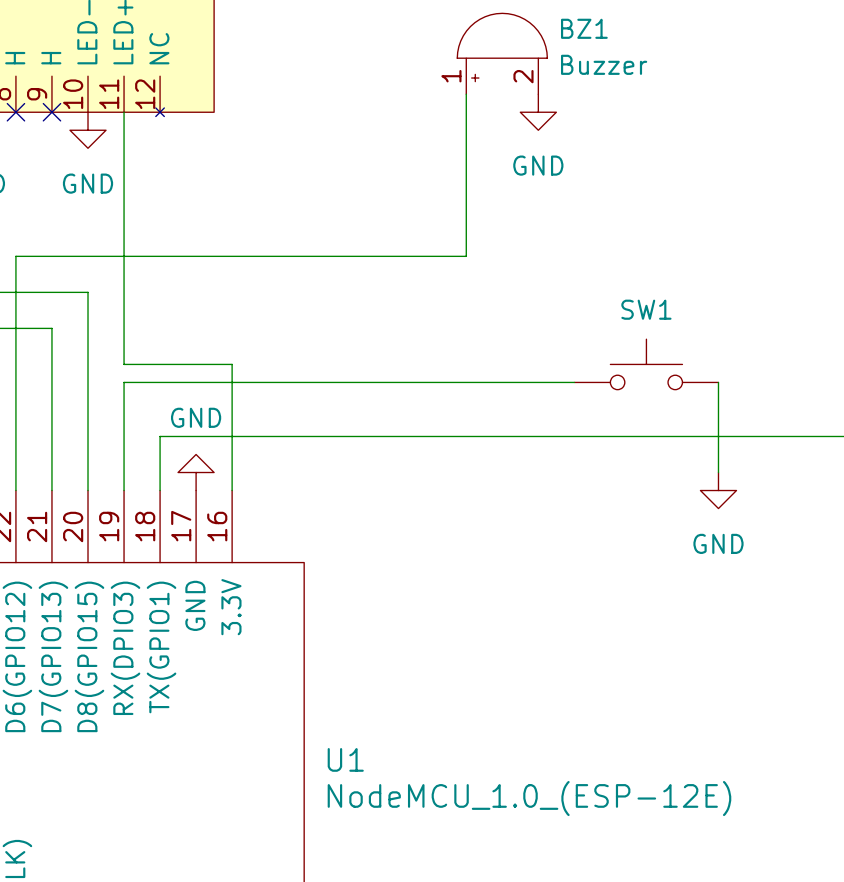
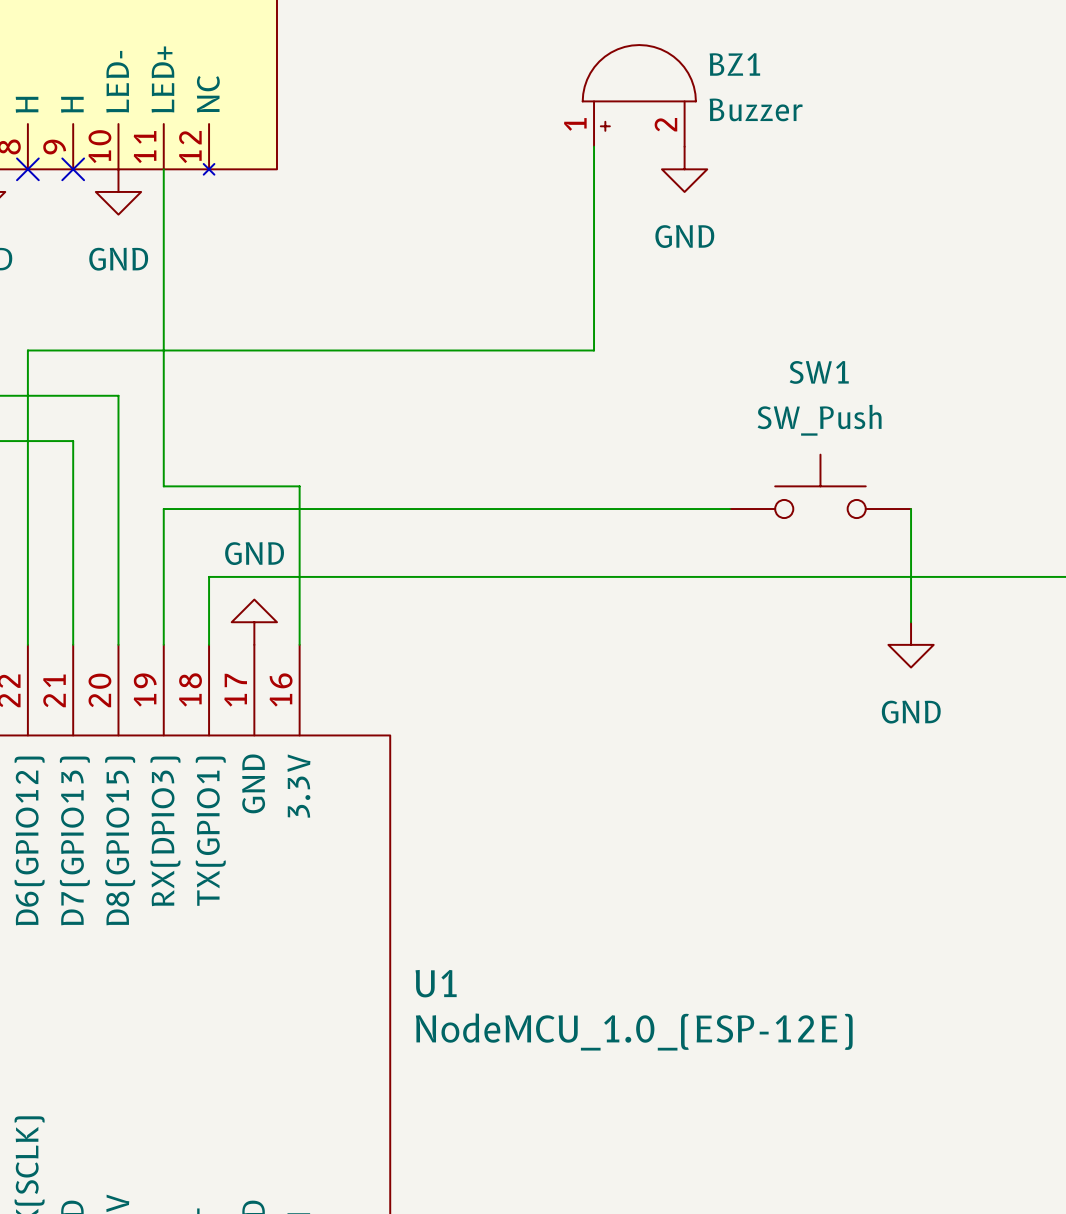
SW1 name position: SW1 (646, 309) -> SW1 (819, 372)
SW1 value: none -> SW_Push (819, 420)

